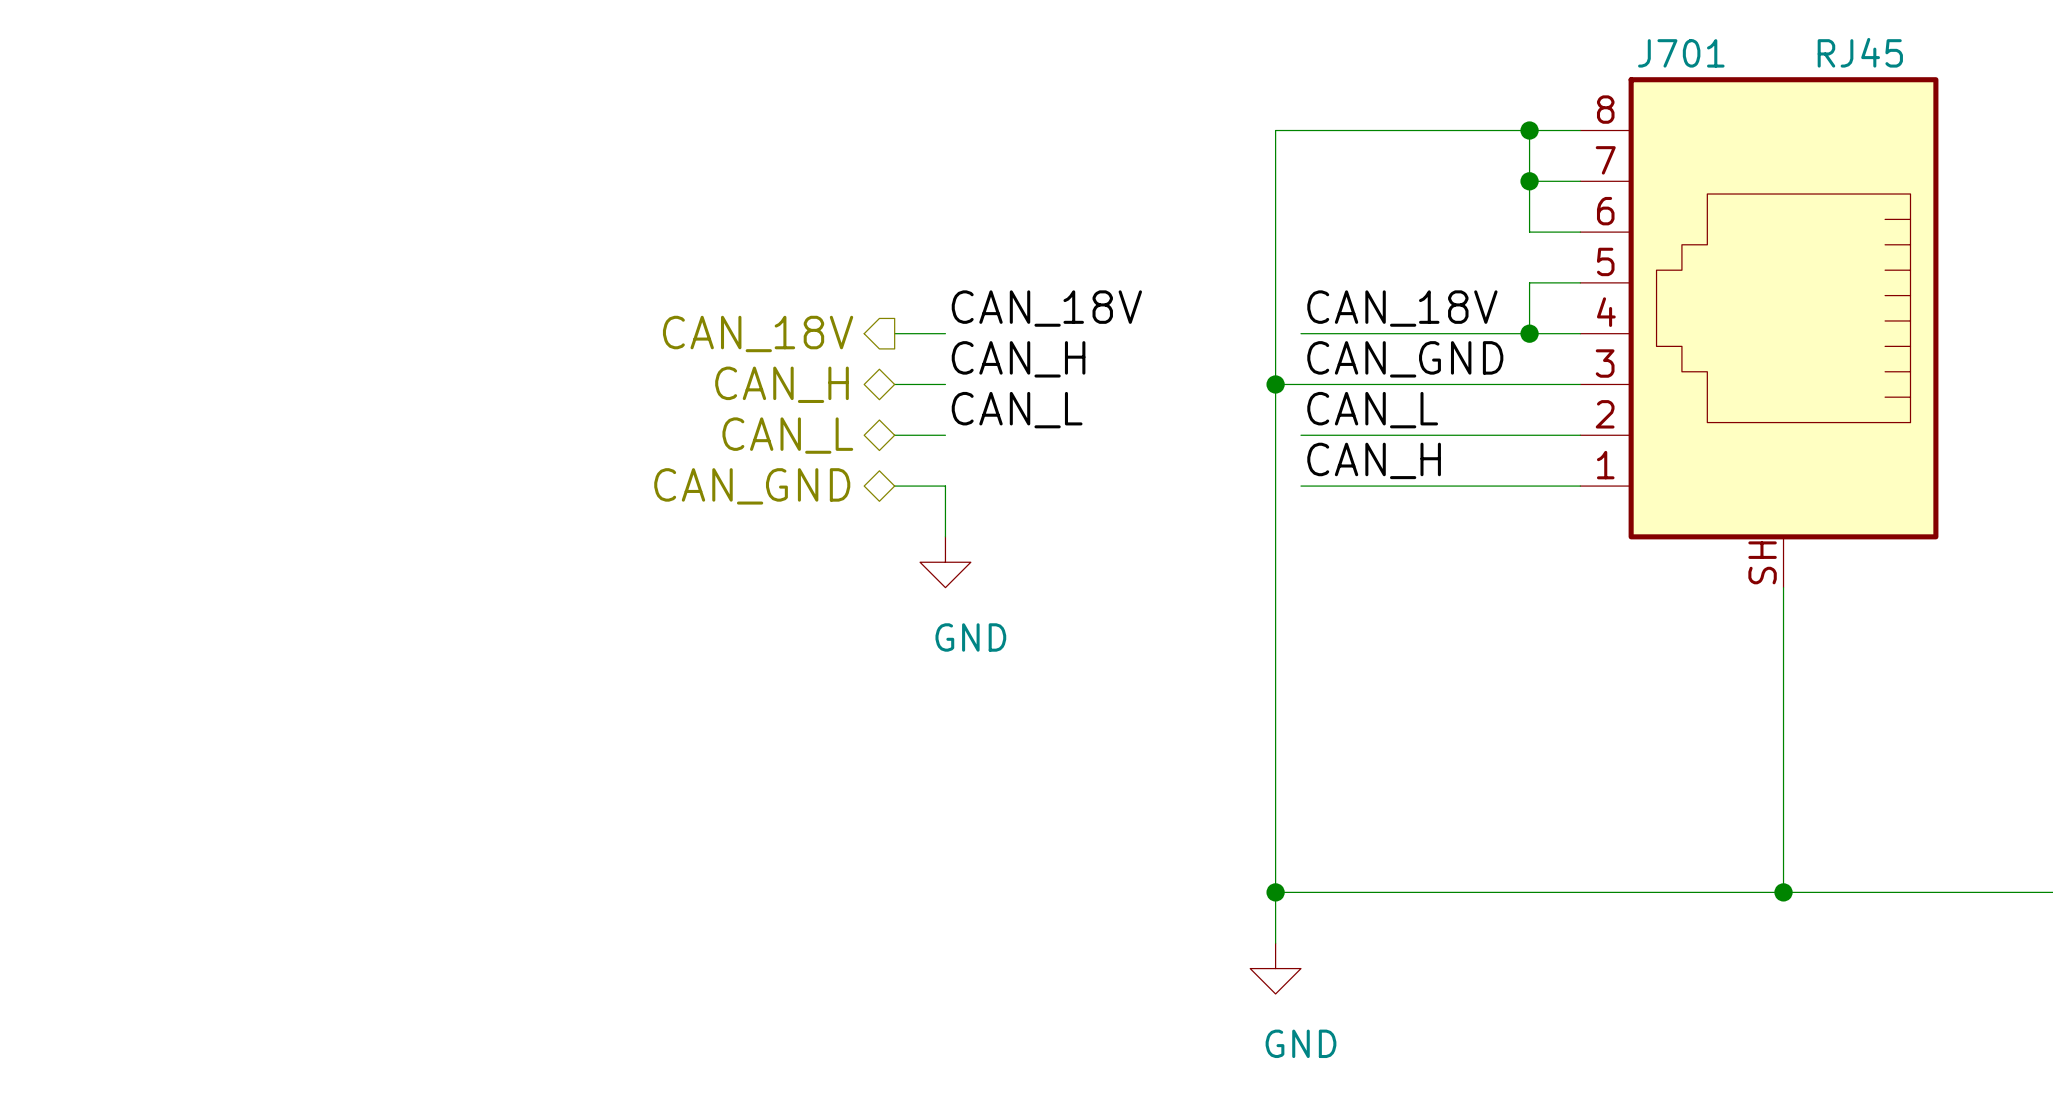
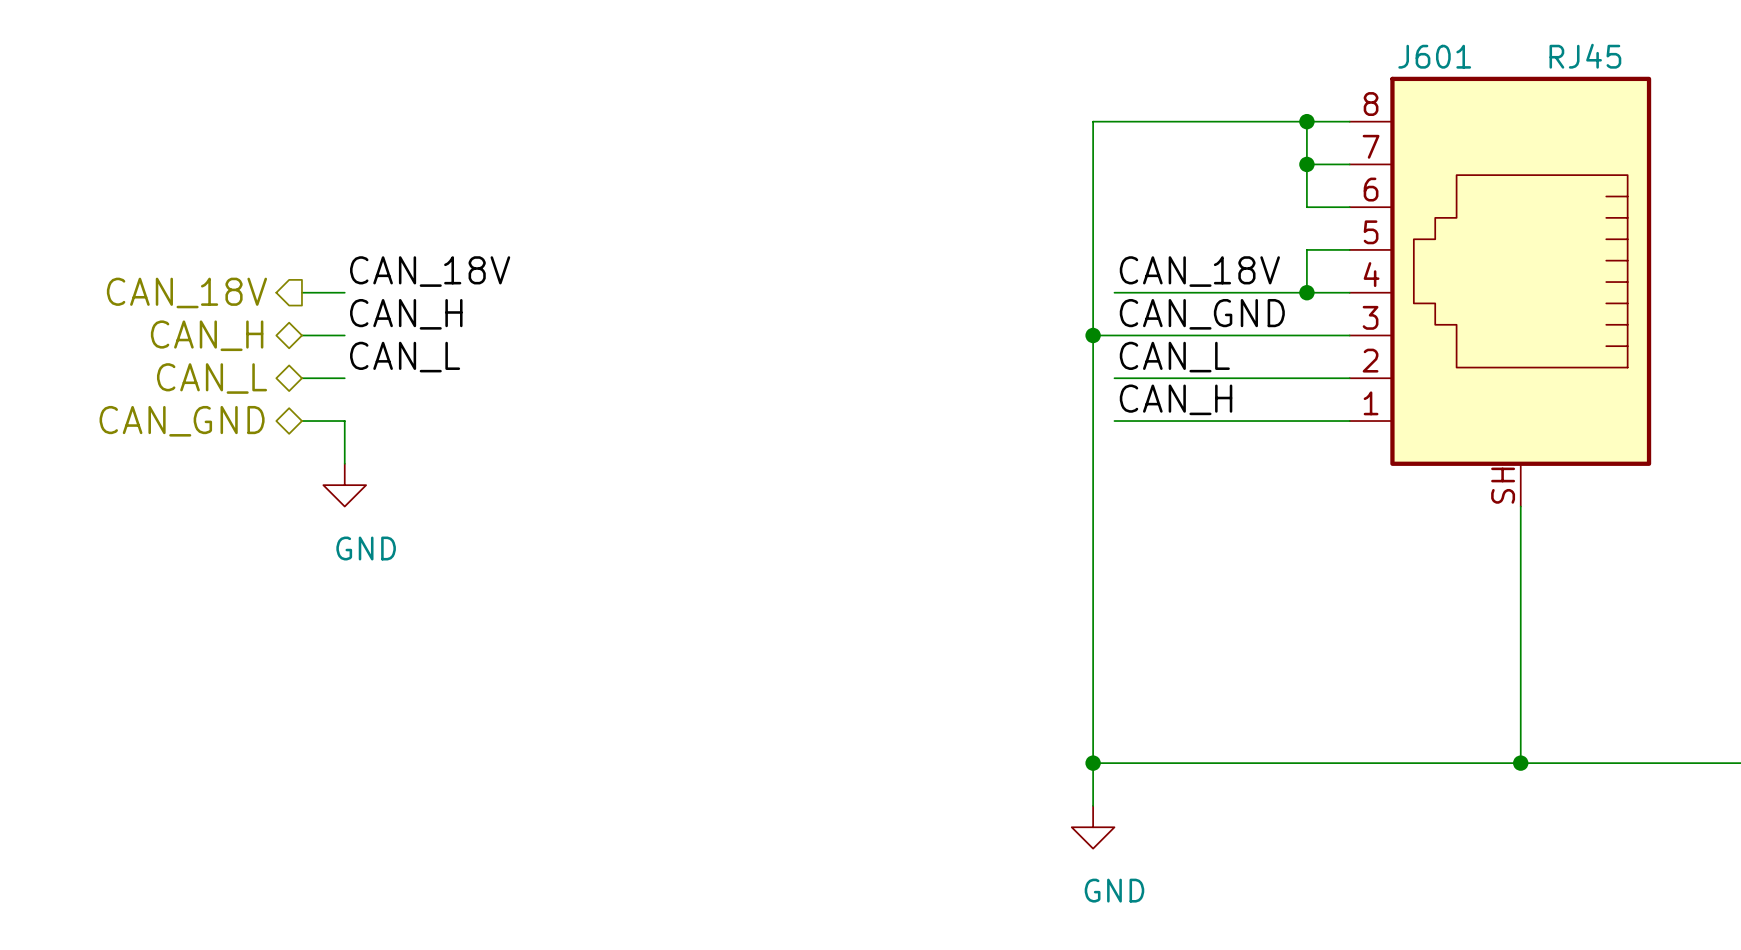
J701 name: J701 (1681, 53) -> J601 (1434, 56)
label: none -> CAN_18V (430, 271)
label: CAN_18V (1046, 308) -> none
hierarchical label: none -> CAN_18V (186, 292)
wire: none -> (301, 292) (344, 292)
hierarchical label: CAN_18V (758, 333) -> none
wire: (894, 333) (945, 333) -> none
label: none -> CAN_H (406, 314)
label: CAN_H (1018, 359) -> none
hierarchical label: none -> CAN_H (207, 335)
wire: none -> (301, 335) (344, 335)
hierarchical label: CAN_H (782, 384) -> none
wire: (894, 384) (945, 384) -> none
label: none -> CAN_L (405, 357)
label: CAN_L (1017, 410) -> none
hierarchical label: none -> CAN_L (212, 378)
wire: none -> (301, 378) (344, 378)
hierarchical label: CAN_L (787, 435) -> none
wire: (894, 435) (945, 435) -> none
hierarchical label: none -> CAN_GND (182, 421)
wire: none -> (301, 421) (344, 421) (344, 463)
hierarchical label: CAN_GND (752, 486) -> none
wire: (894, 486) (945, 486) (945, 536) -> none
power symbol: none -> GND (344, 485)
power symbol: GND (945, 562) -> none

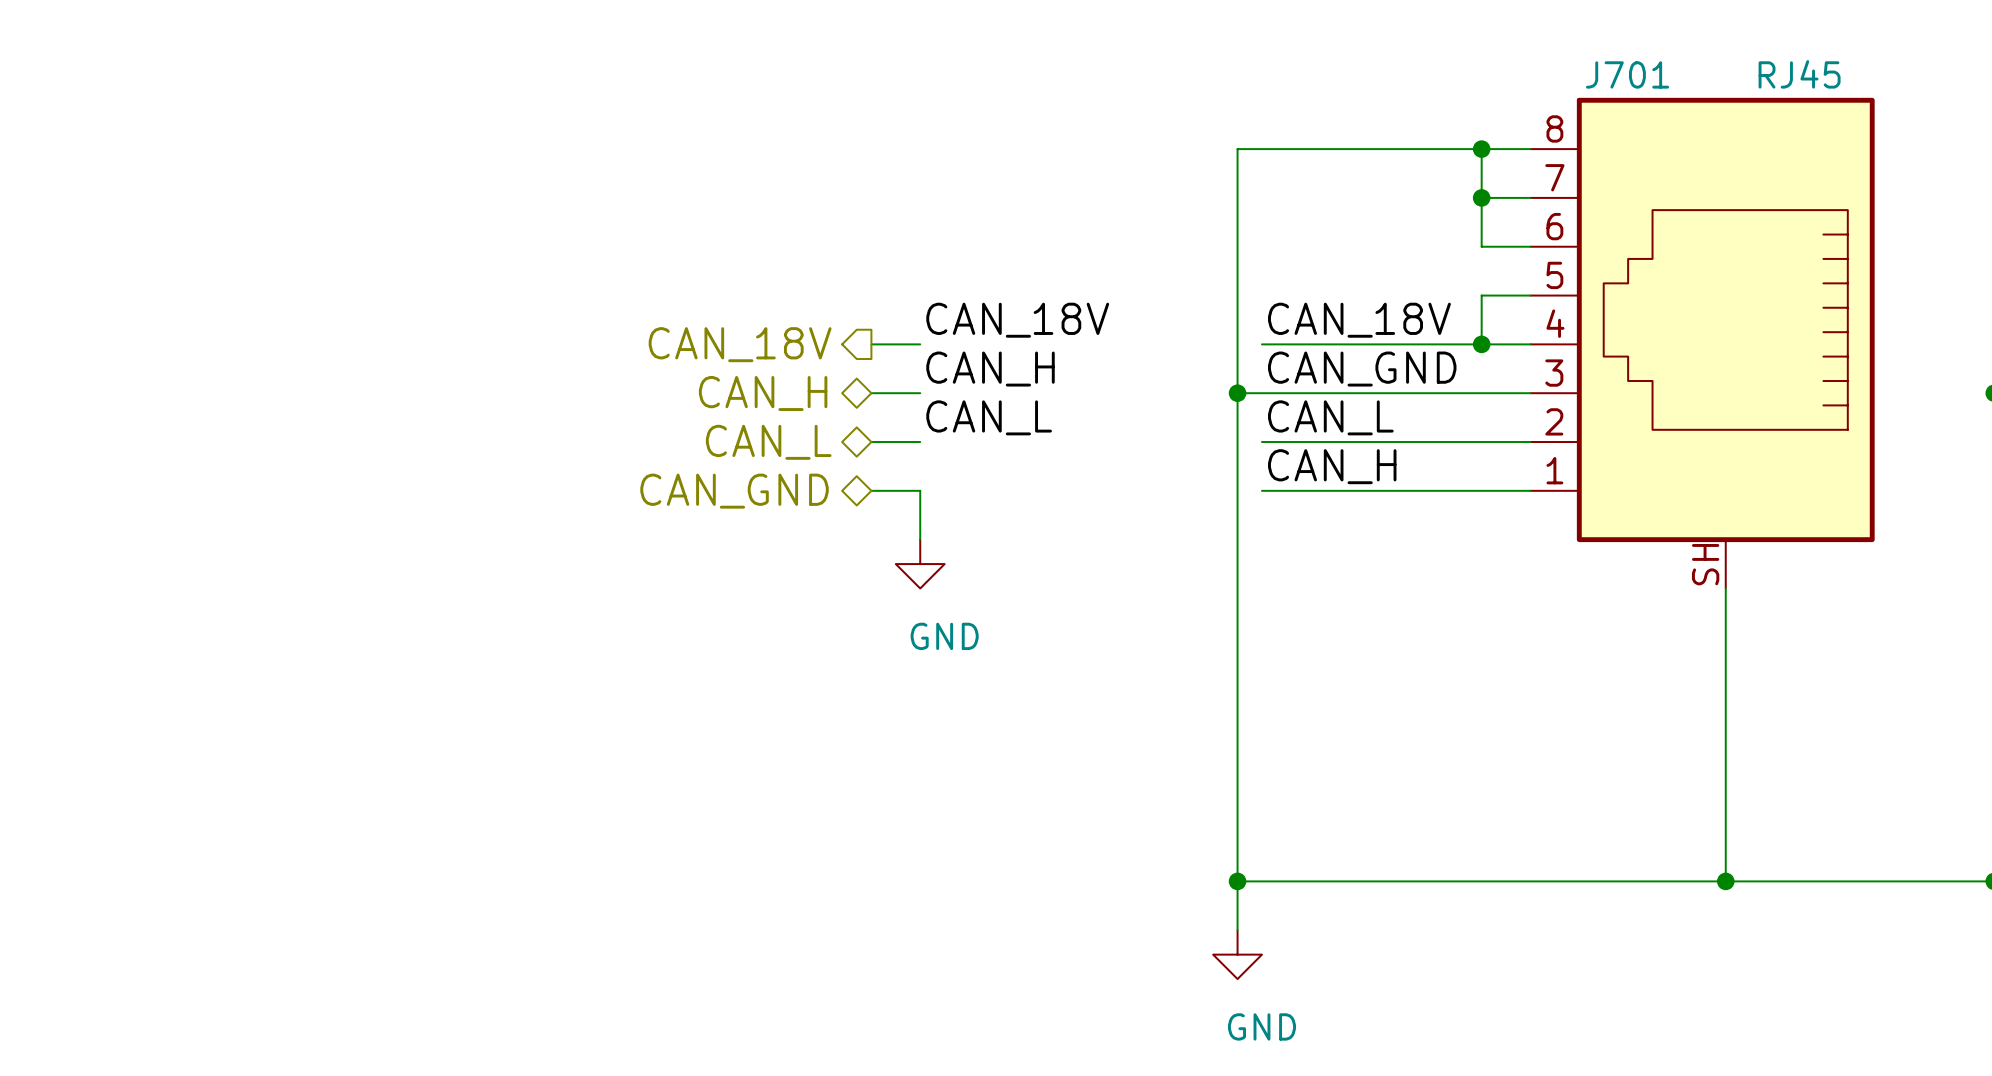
J601 name: J601 (1434, 56) -> J701 (1627, 74)
label: CAN_18V (430, 271) -> none
label: none -> CAN_18V (1017, 320)
hierarchical label: CAN_18V (186, 292) -> none
wire: (301, 292) (344, 292) -> none
hierarchical label: none -> CAN_18V (740, 344)
wire: none -> (871, 344) (920, 344)
label: CAN_H (406, 314) -> none
label: none -> CAN_H (990, 369)
hierarchical label: CAN_H (207, 335) -> none
wire: (301, 335) (344, 335) -> none
hierarchical label: none -> CAN_H (763, 393)
wire: none -> (871, 393) (920, 393)
label: CAN_L (405, 357) -> none
label: none -> CAN_L (989, 417)
hierarchical label: CAN_L (212, 378) -> none
wire: (301, 378) (344, 378) -> none
hierarchical label: none -> CAN_L (768, 442)
wire: none -> (871, 442) (920, 442)
hierarchical label: CAN_GND (182, 421) -> none
wire: (301, 421) (344, 421) (344, 463) -> none
hierarchical label: none -> CAN_GND (734, 491)
wire: none -> (871, 490) (920, 490) (920, 539)
power symbol: GND (344, 485) -> none
power symbol: none -> GND (920, 564)

